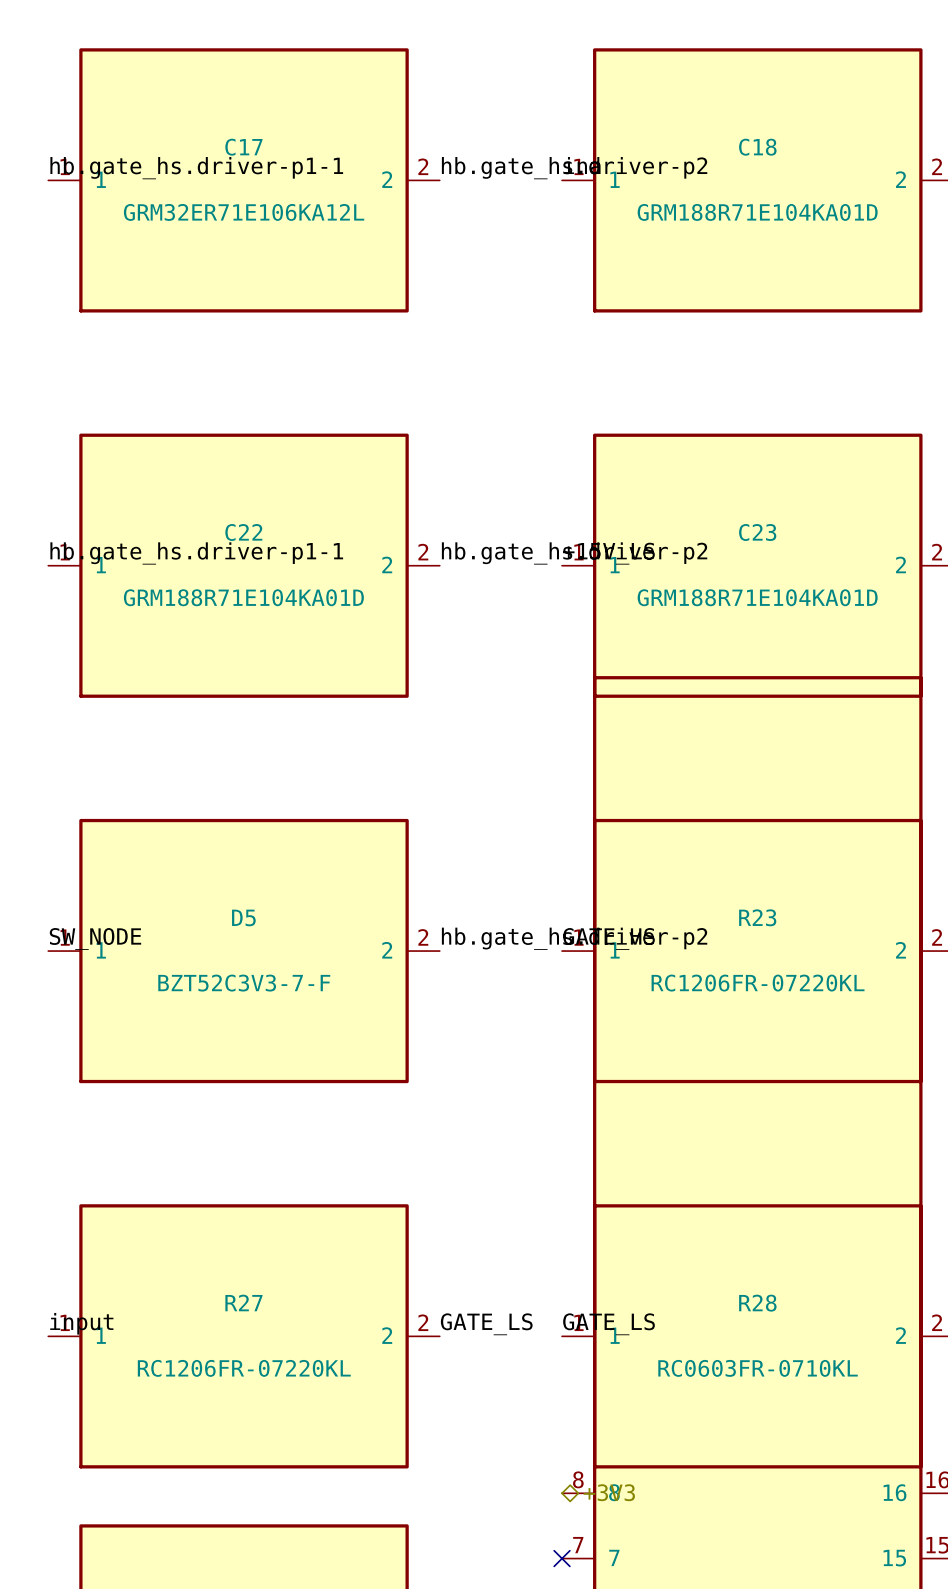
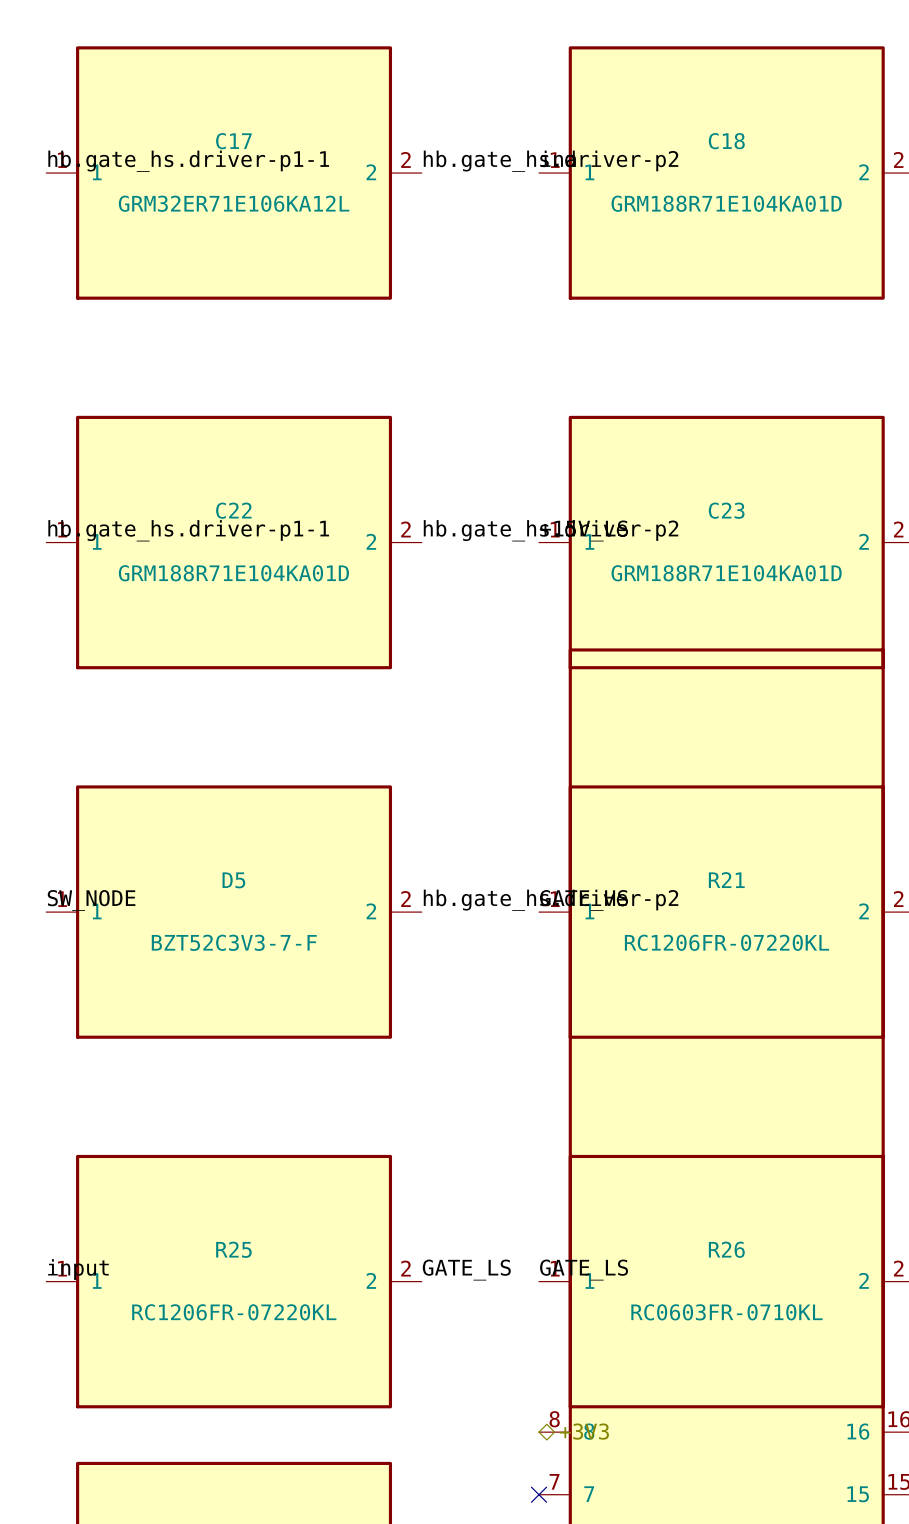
R23 name: R23 (757, 917) -> R21 (726, 880)
R27 name: R27 (243, 1302) -> R25 (233, 1249)
R28 name: R28 (757, 1303) -> R26 (726, 1249)

